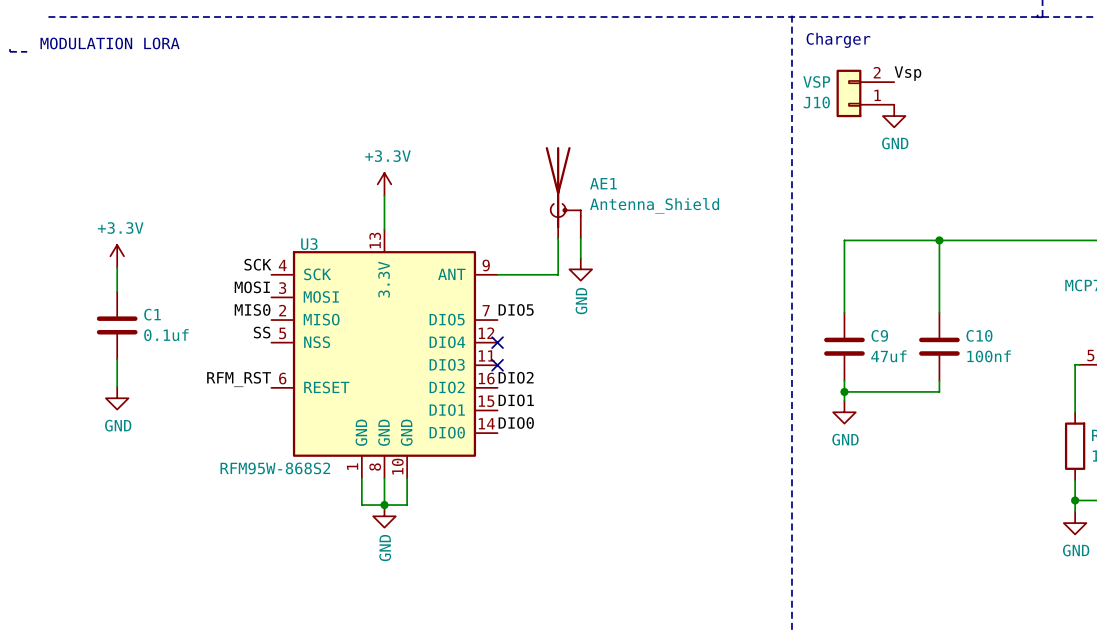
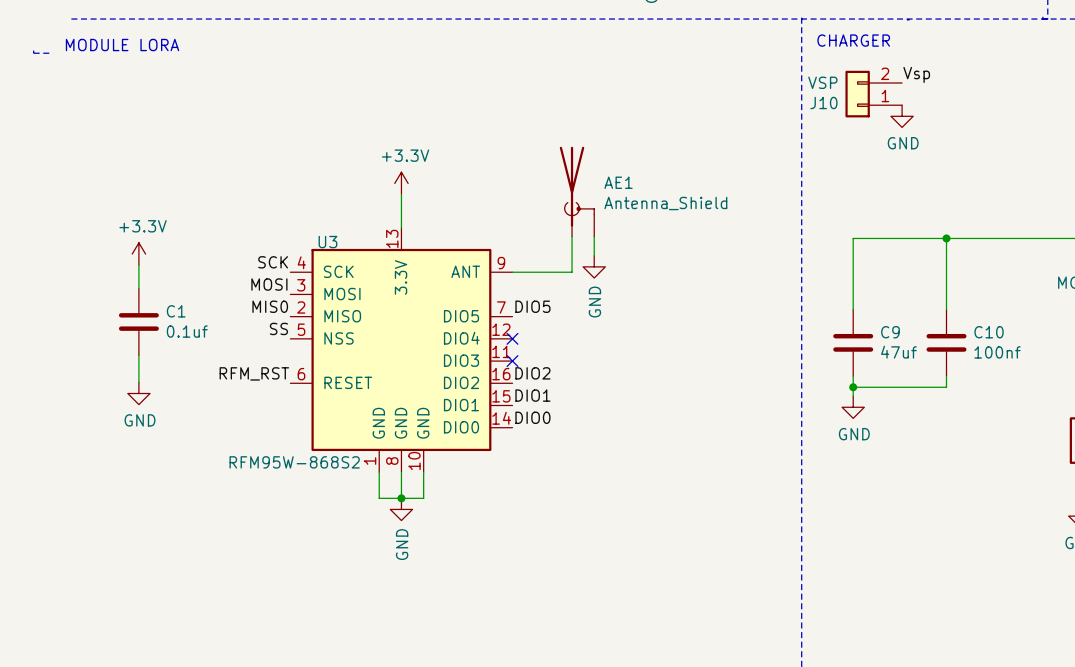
text: Charger (838, 40) -> CHARGER (853, 40)
text: MODULATION LORA (110, 43) -> MODULE LORA (122, 45)

